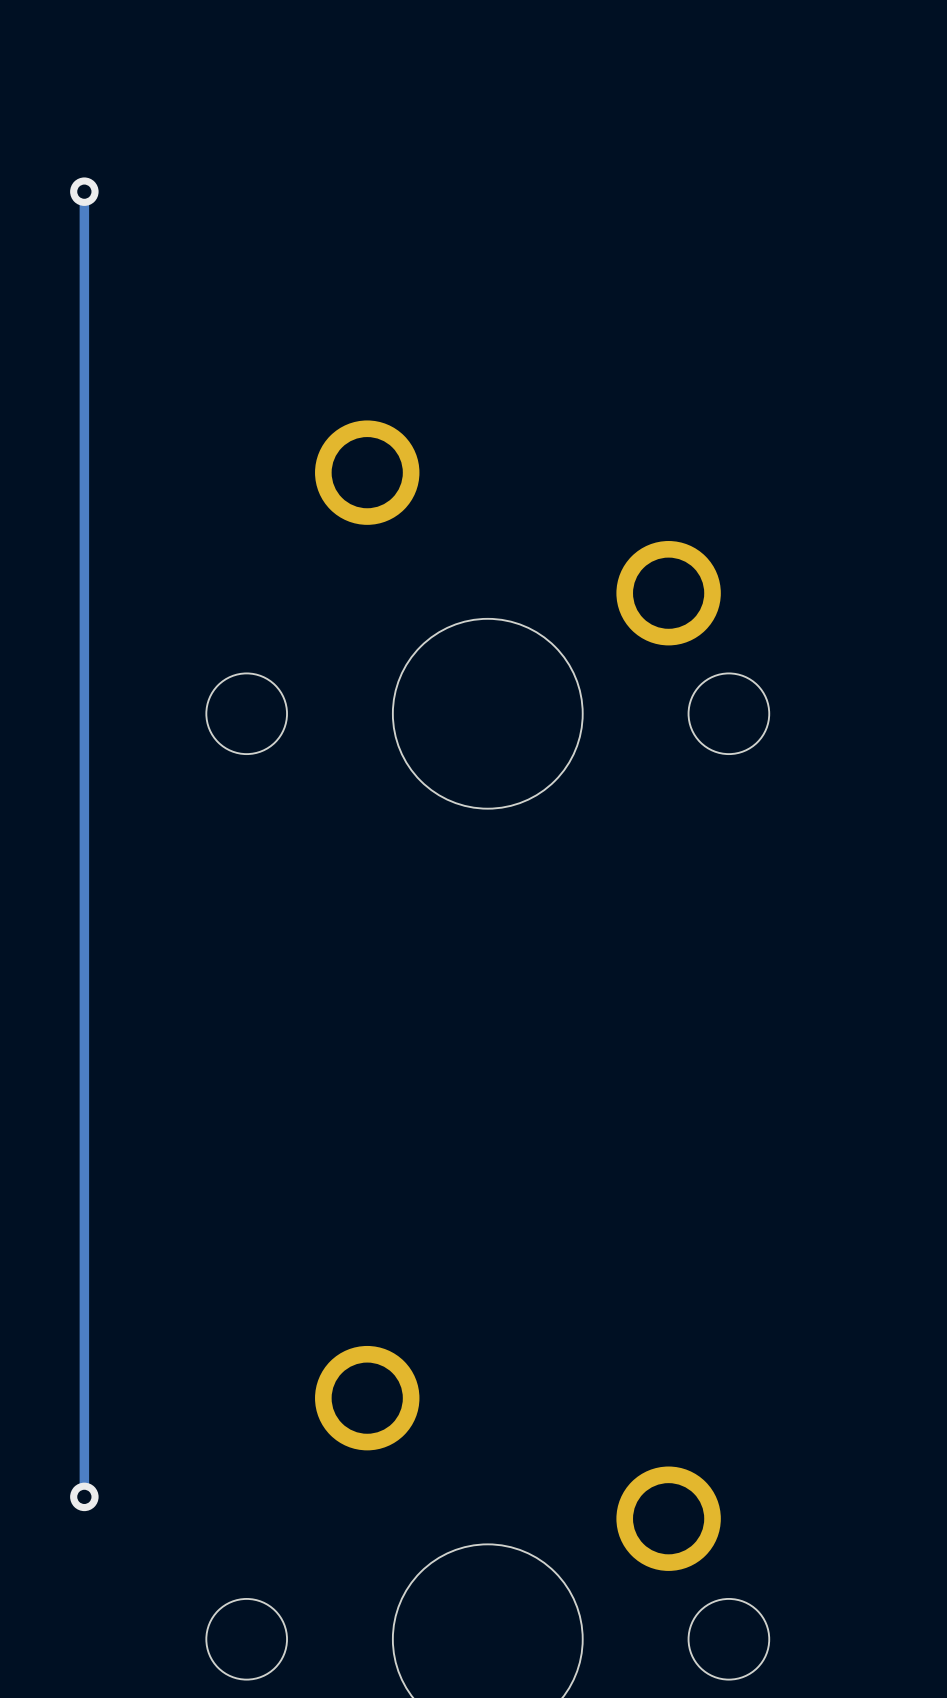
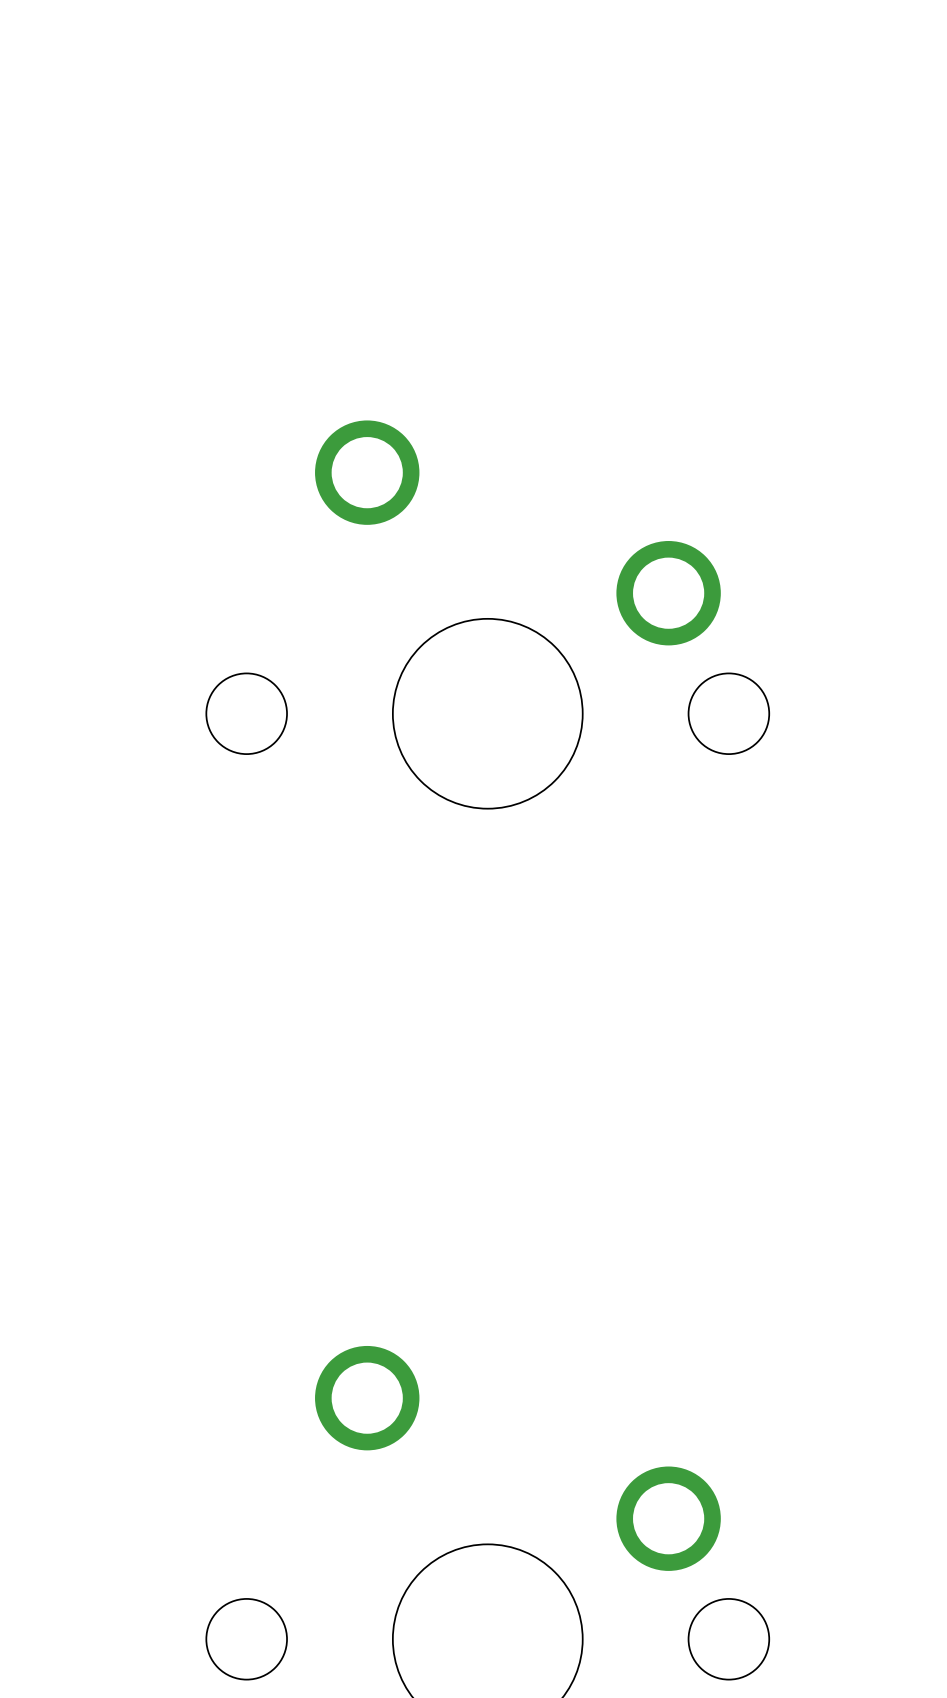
track: (84, 191) (84, 1496) -> none
via: (84, 191) -> none
via: (84, 1496) -> none

